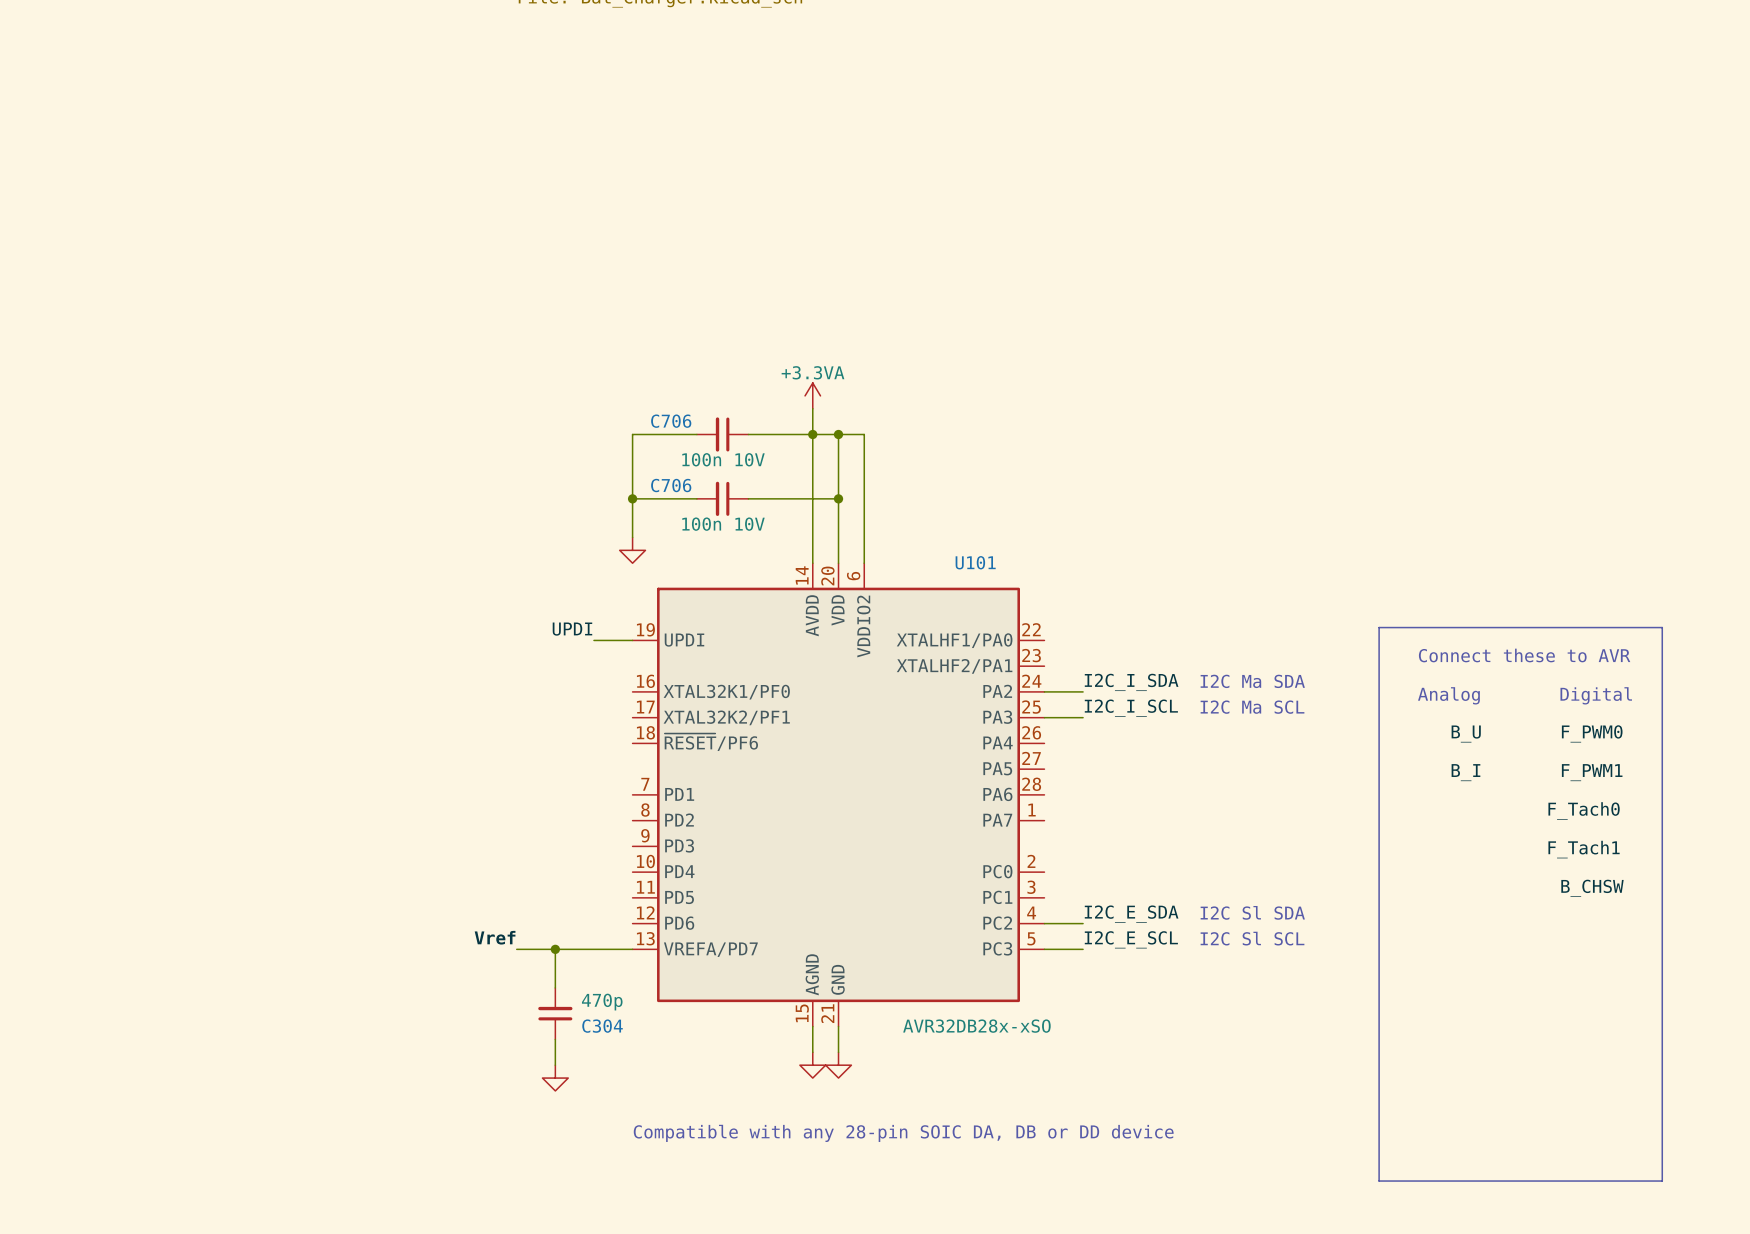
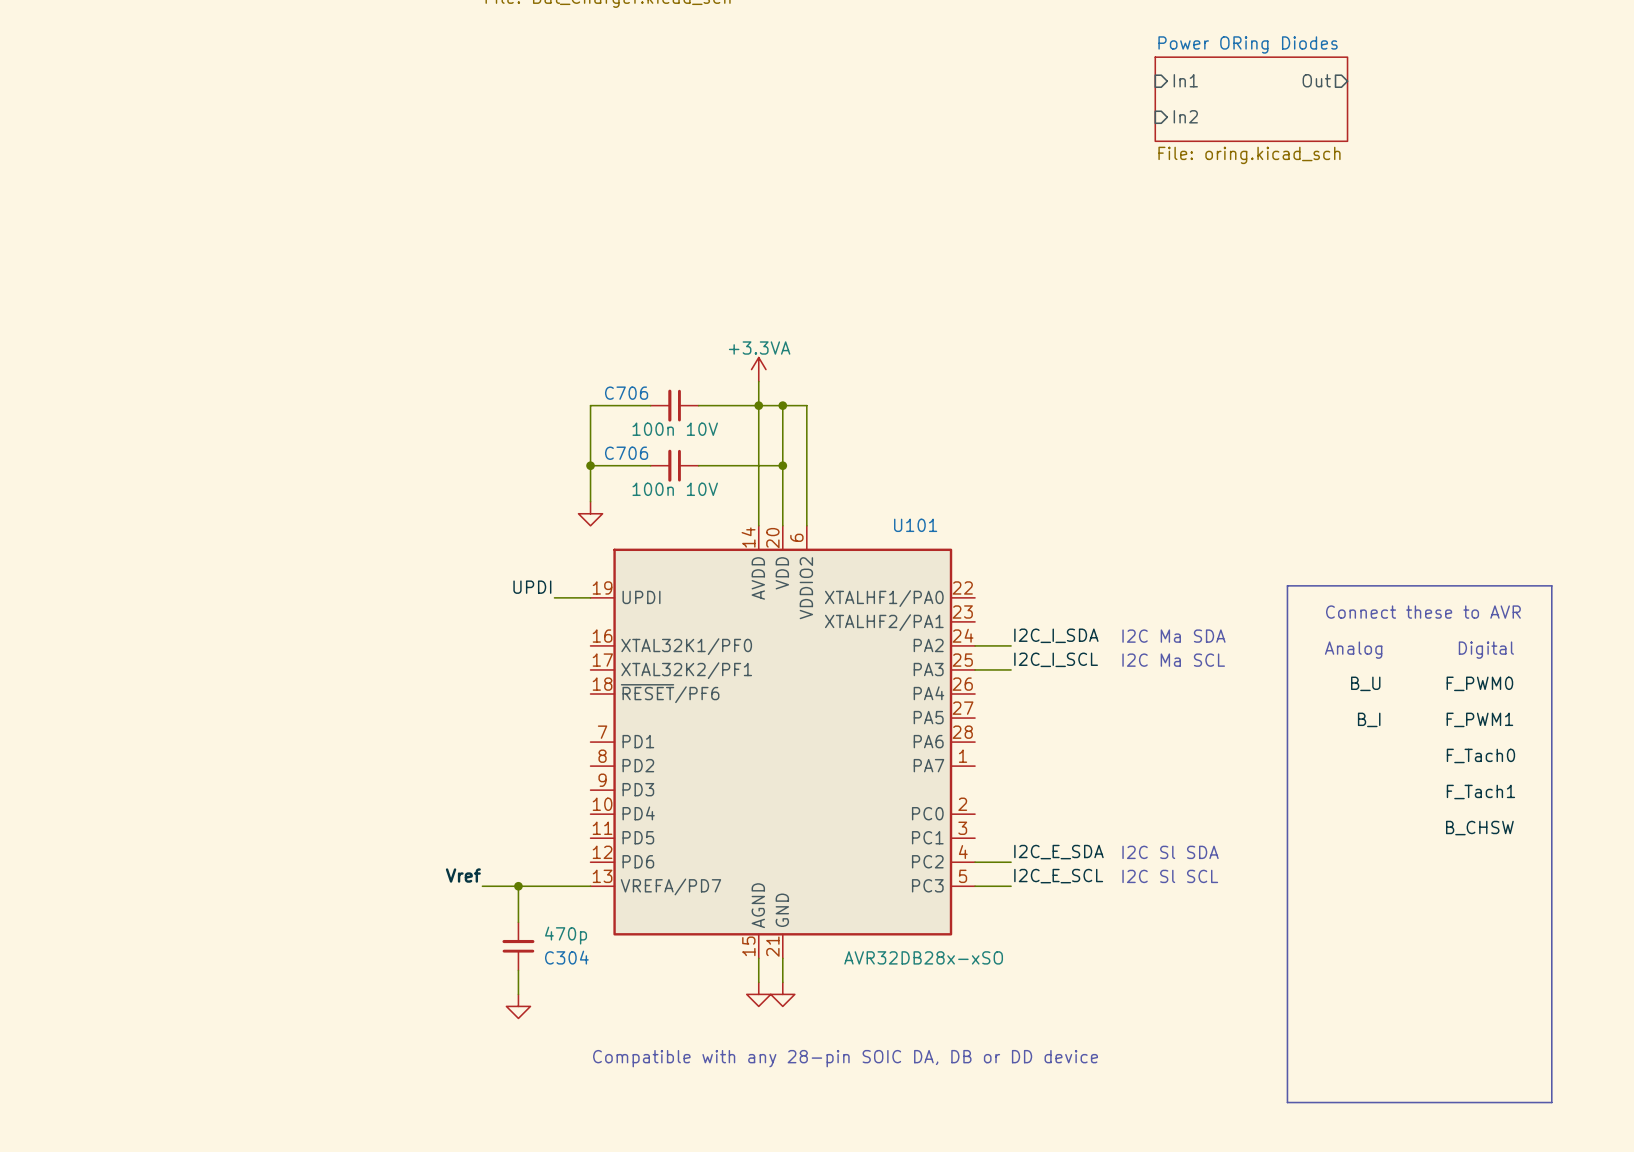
sheet pin: none -> In1 (1185, 80)
sheet pin: none -> Out (1316, 80)
sheet Power ORing Diodes: none -> File: oring.kicad_sch (1251, 99)
sheet pin: none -> In2 (1185, 116)

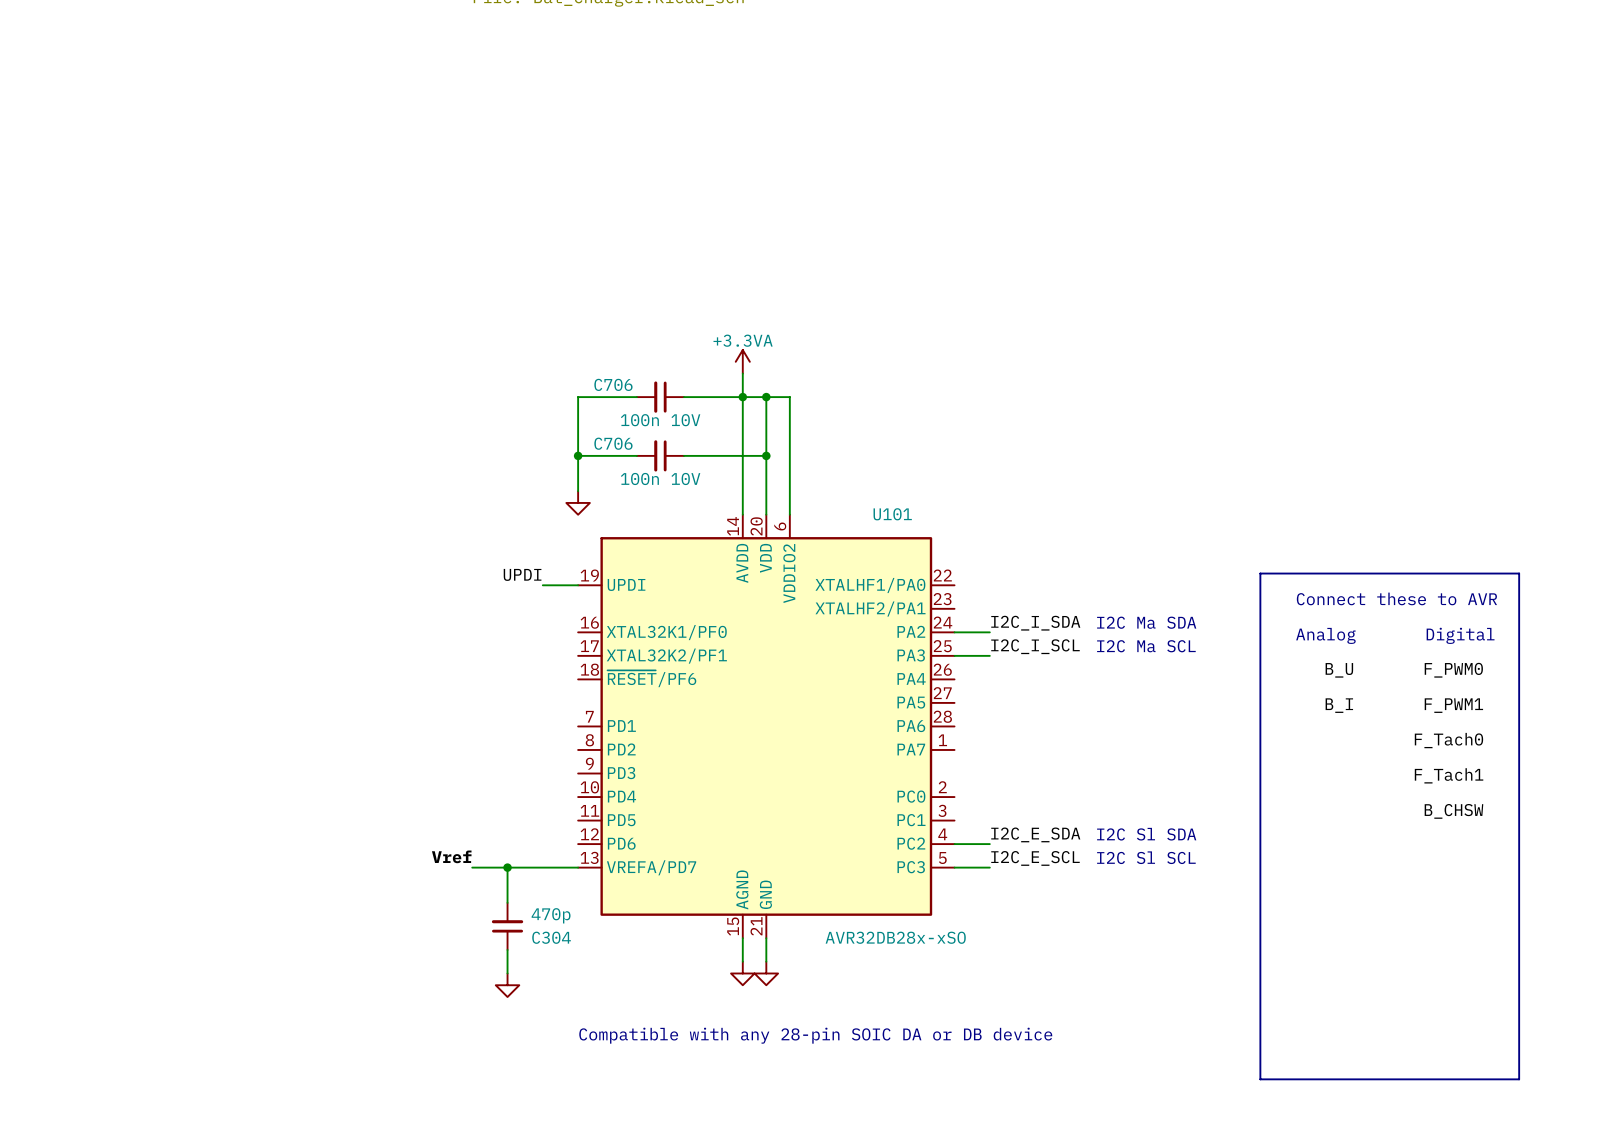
sheet pin: In1 (1185, 80) -> none
sheet pin: Out (1316, 80) -> none
sheet Power ORing Diodes: File: oring.kicad_sch (1251, 99) -> none
sheet pin: In2 (1185, 116) -> none
text: Compatible with any 28-pin SOIC DA, DB or DD device (845, 1058) -> Compatible with any 28-pin SOIC DA or DB device (815, 1035)

